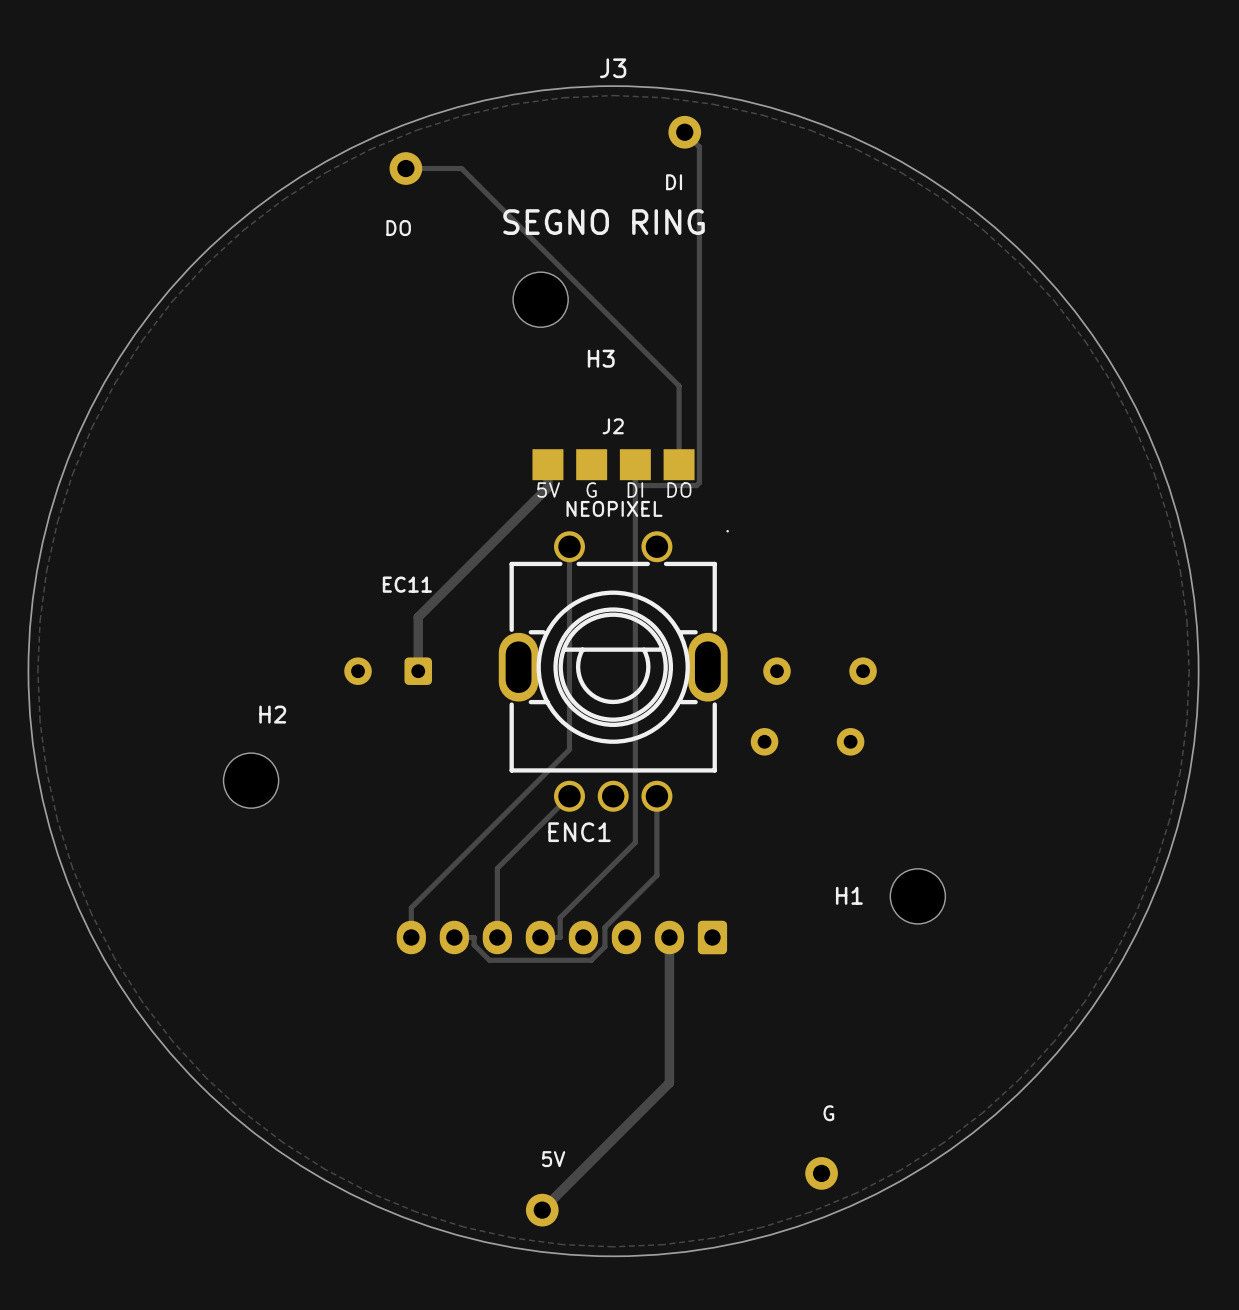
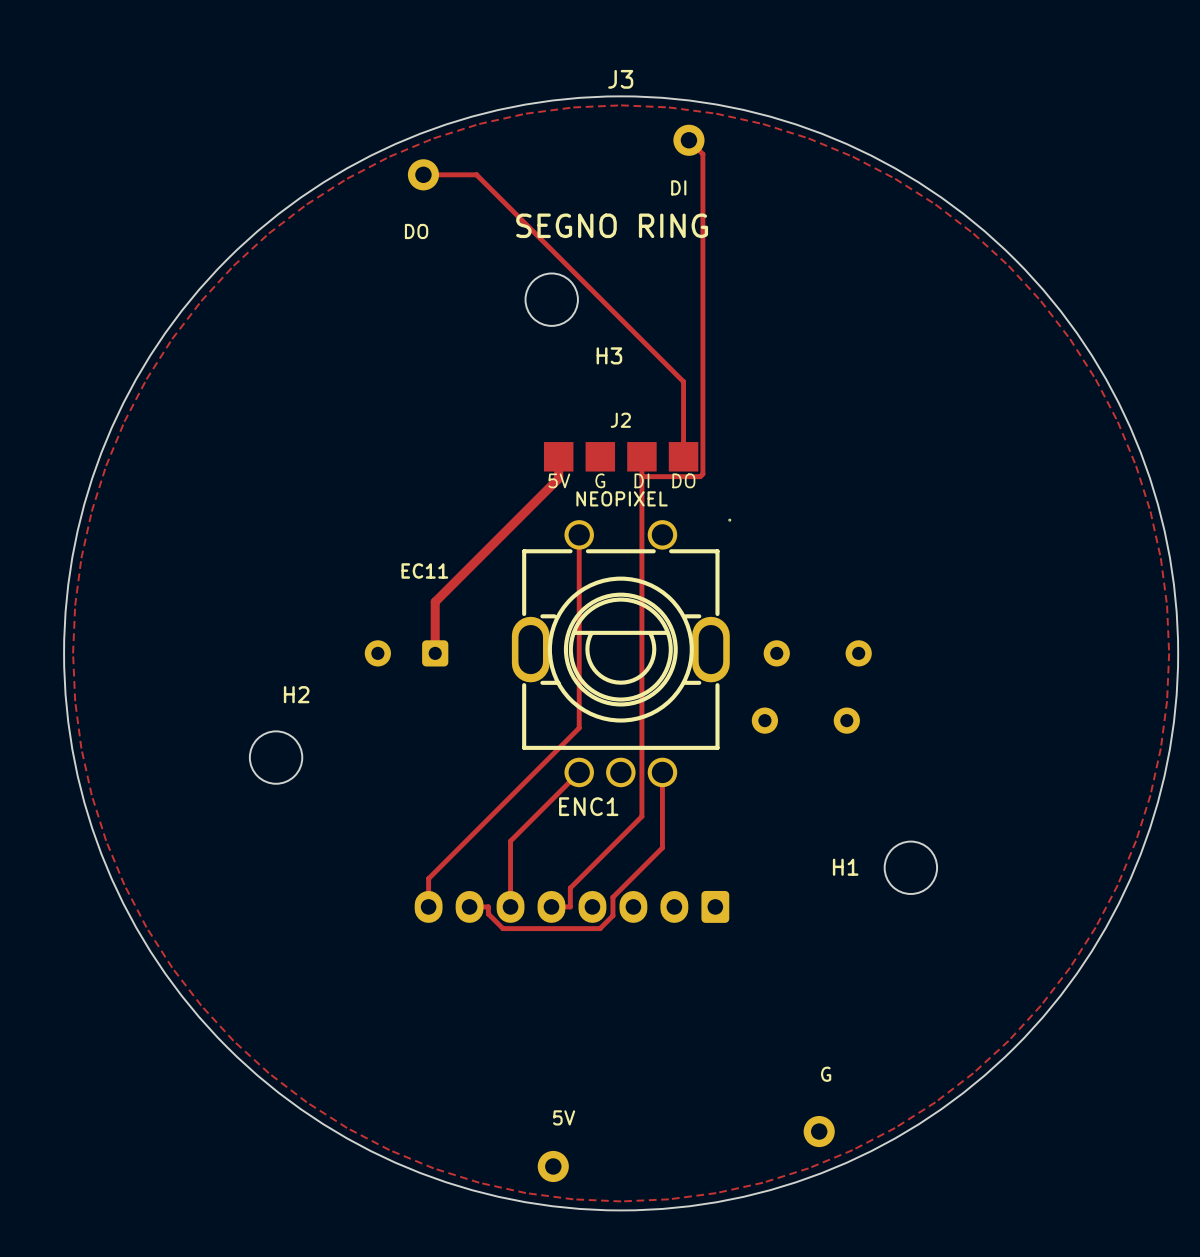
track: (669, 937) (669, 1082) (542, 1210) -> none

